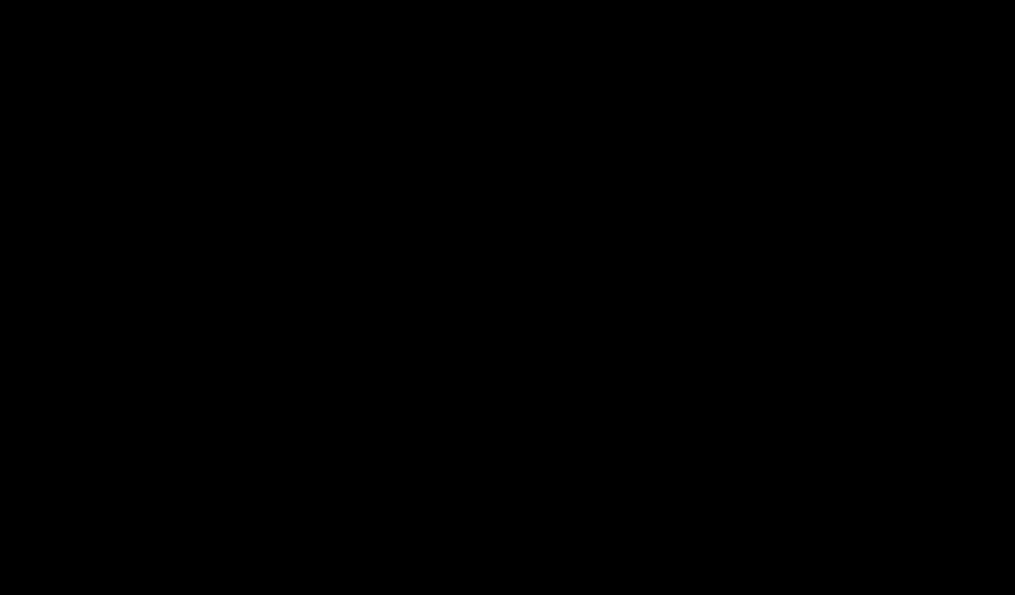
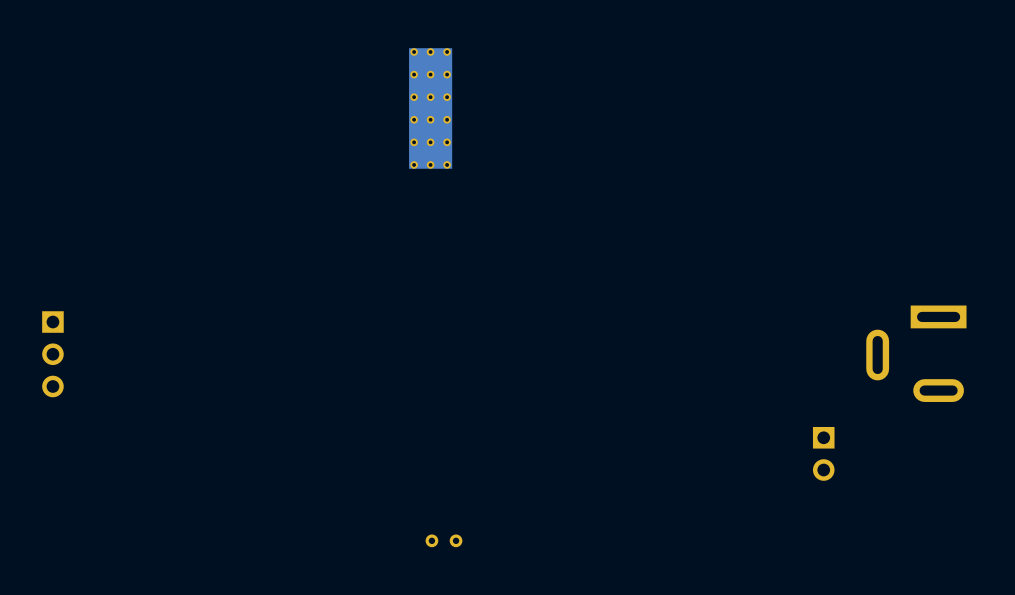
part: none -> (430, 108)
part: none -> (916, 353)
part: none -> (52, 354)
part: none -> (823, 453)
part: none -> (443, 540)

